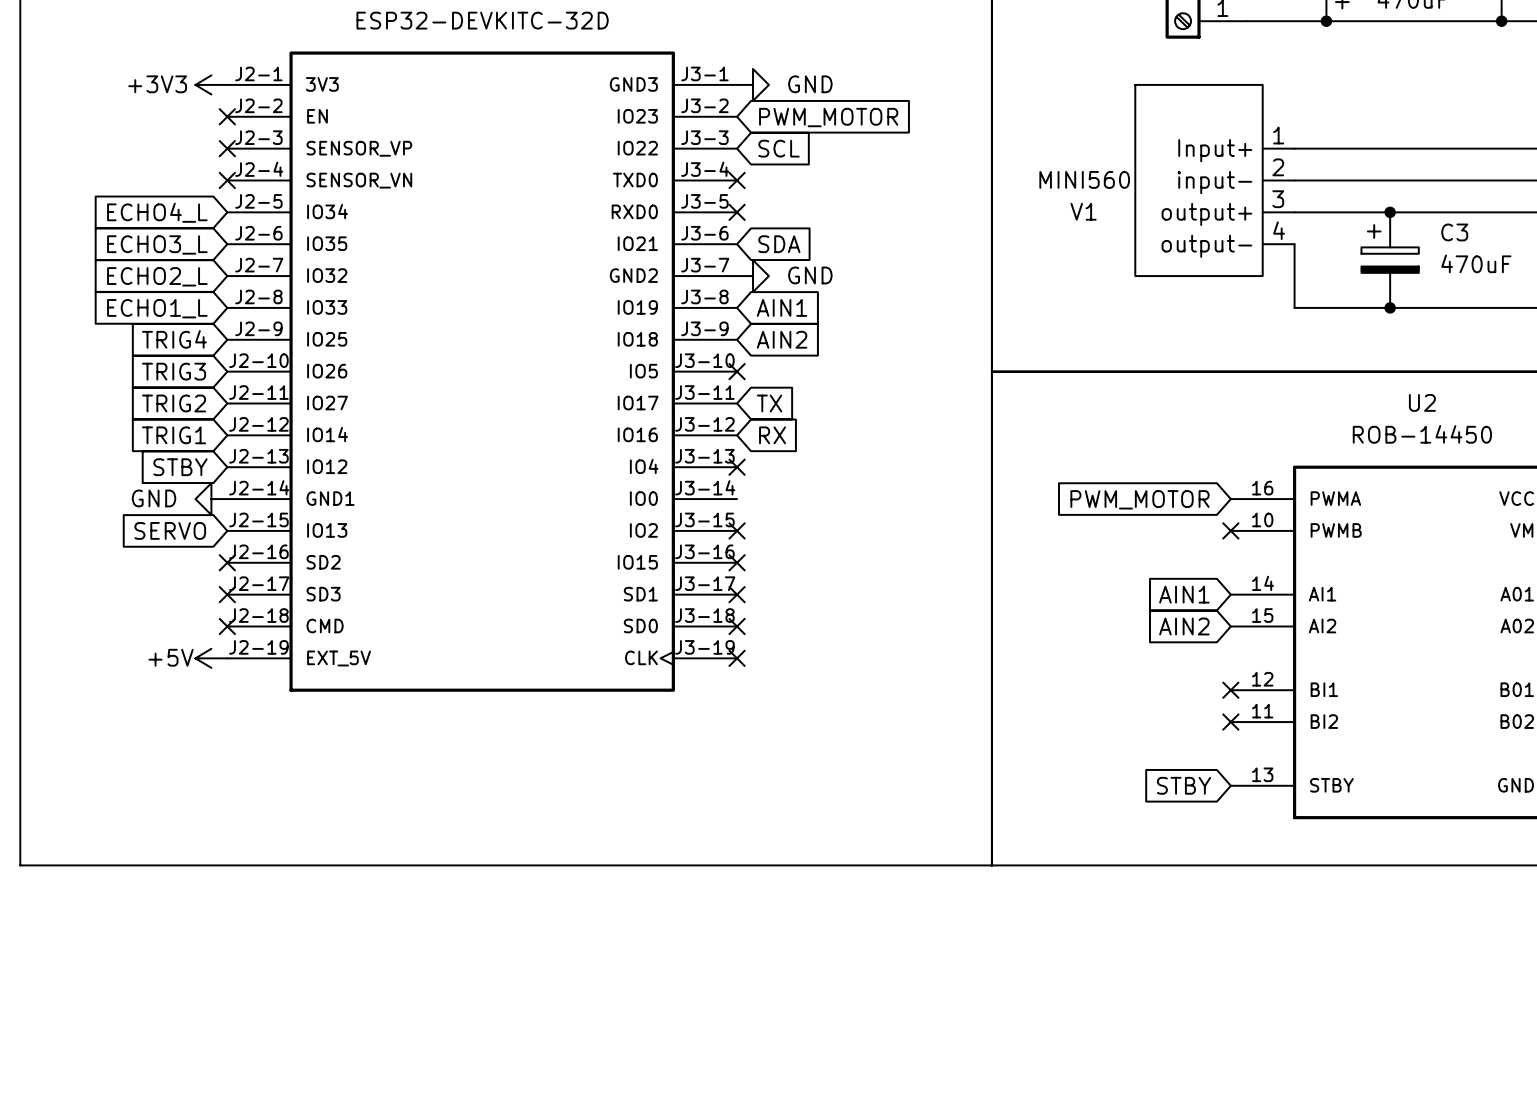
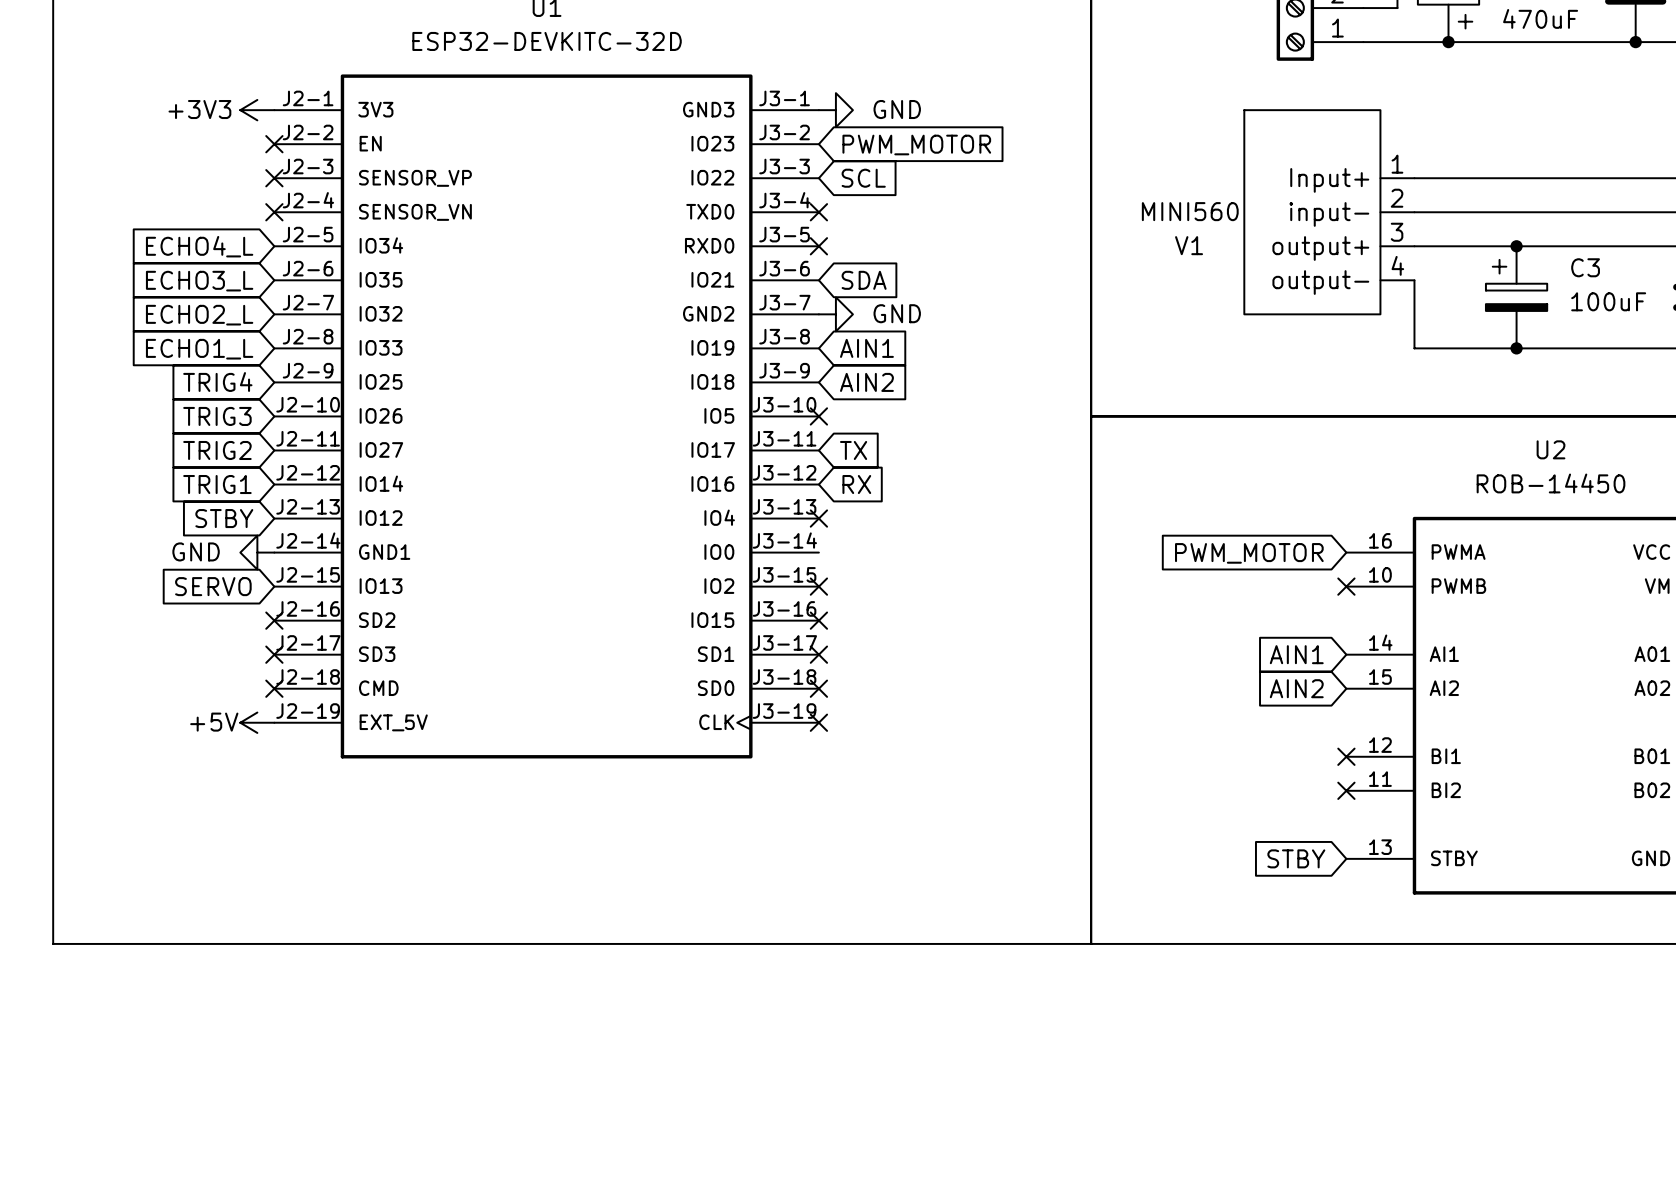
C3 value: 470uF (1476, 263) -> 100uF (1608, 301)

